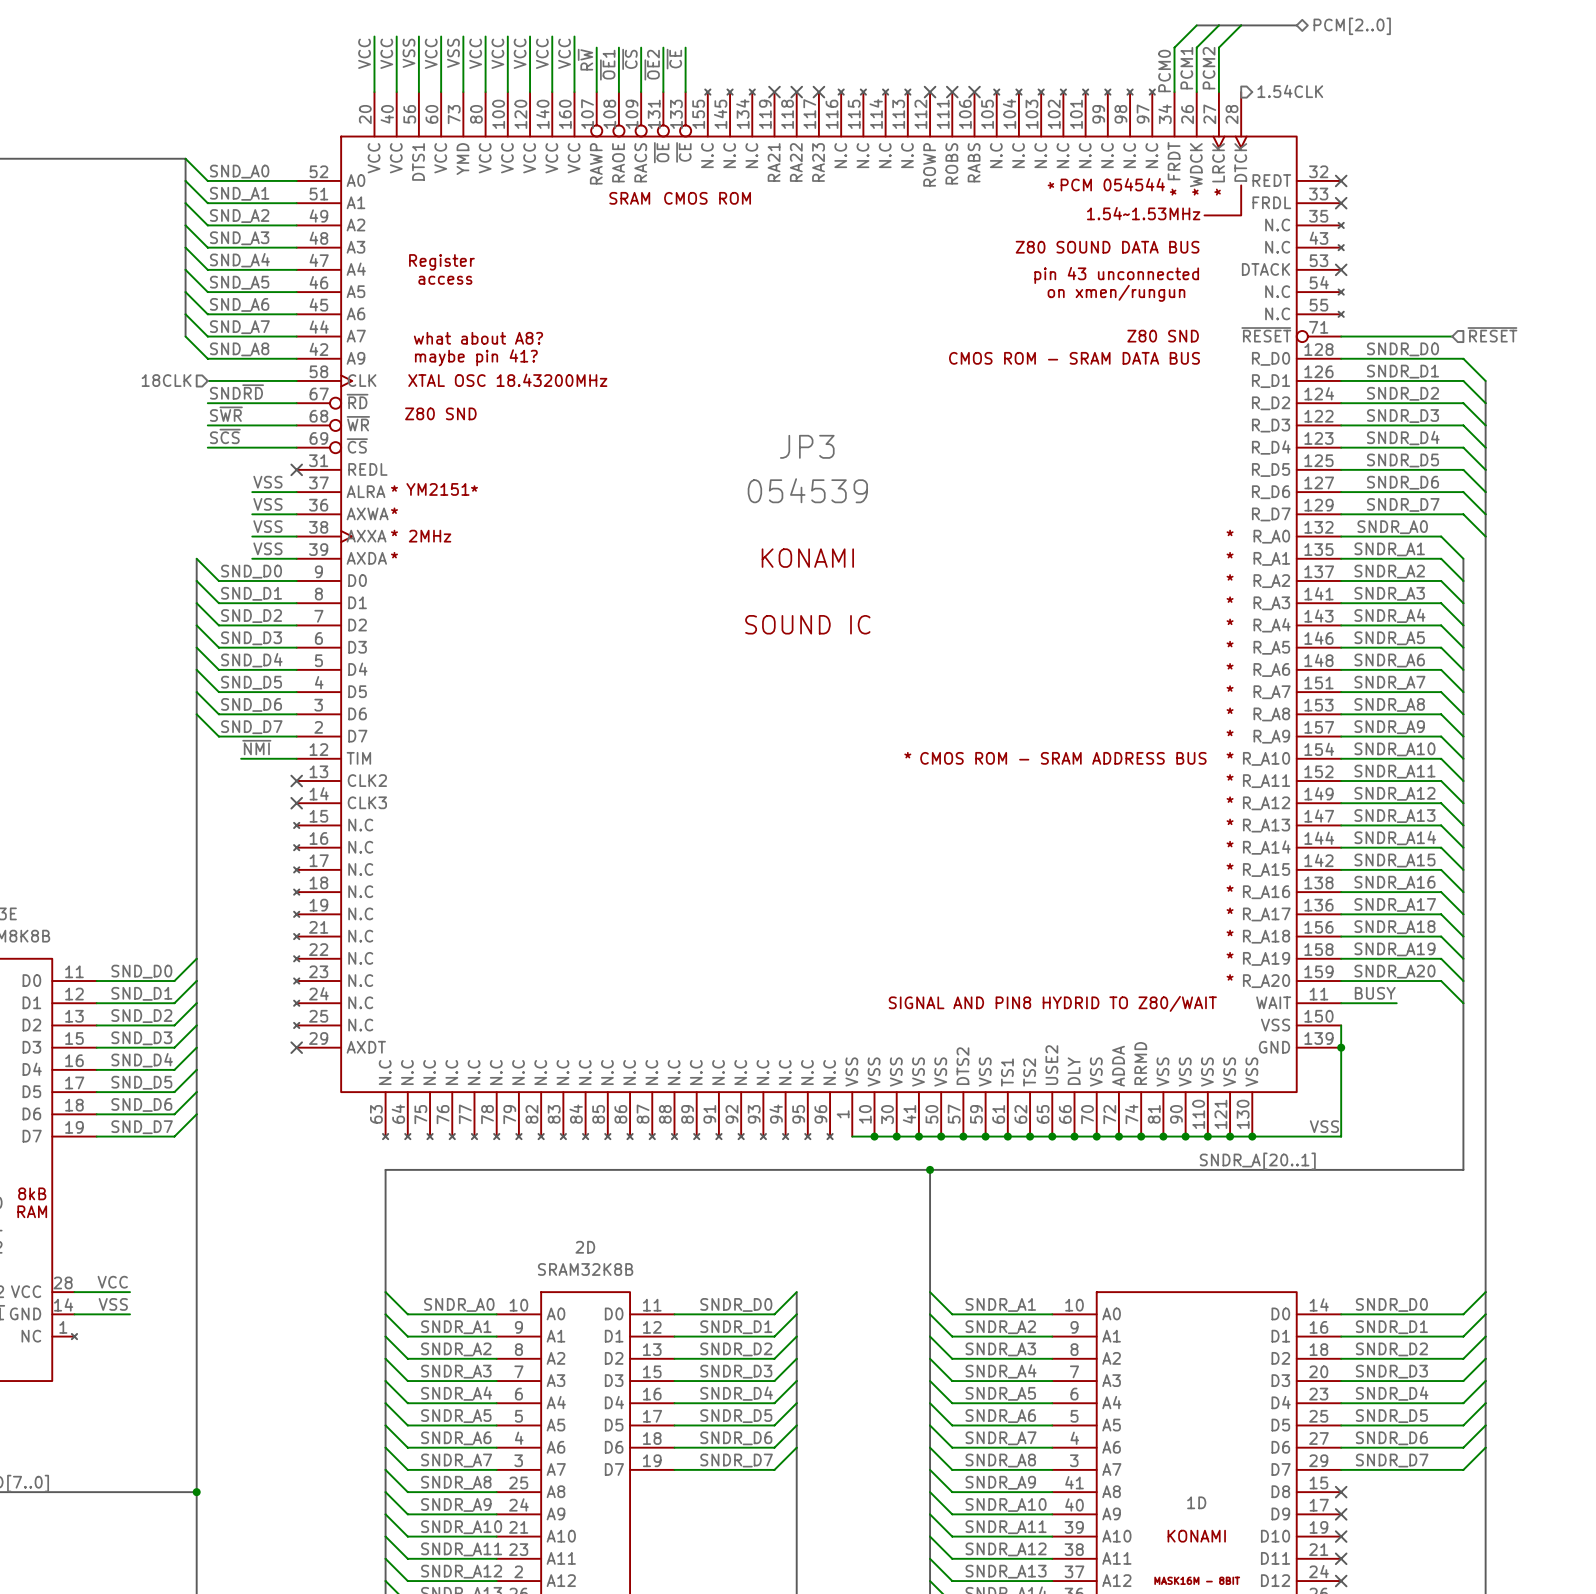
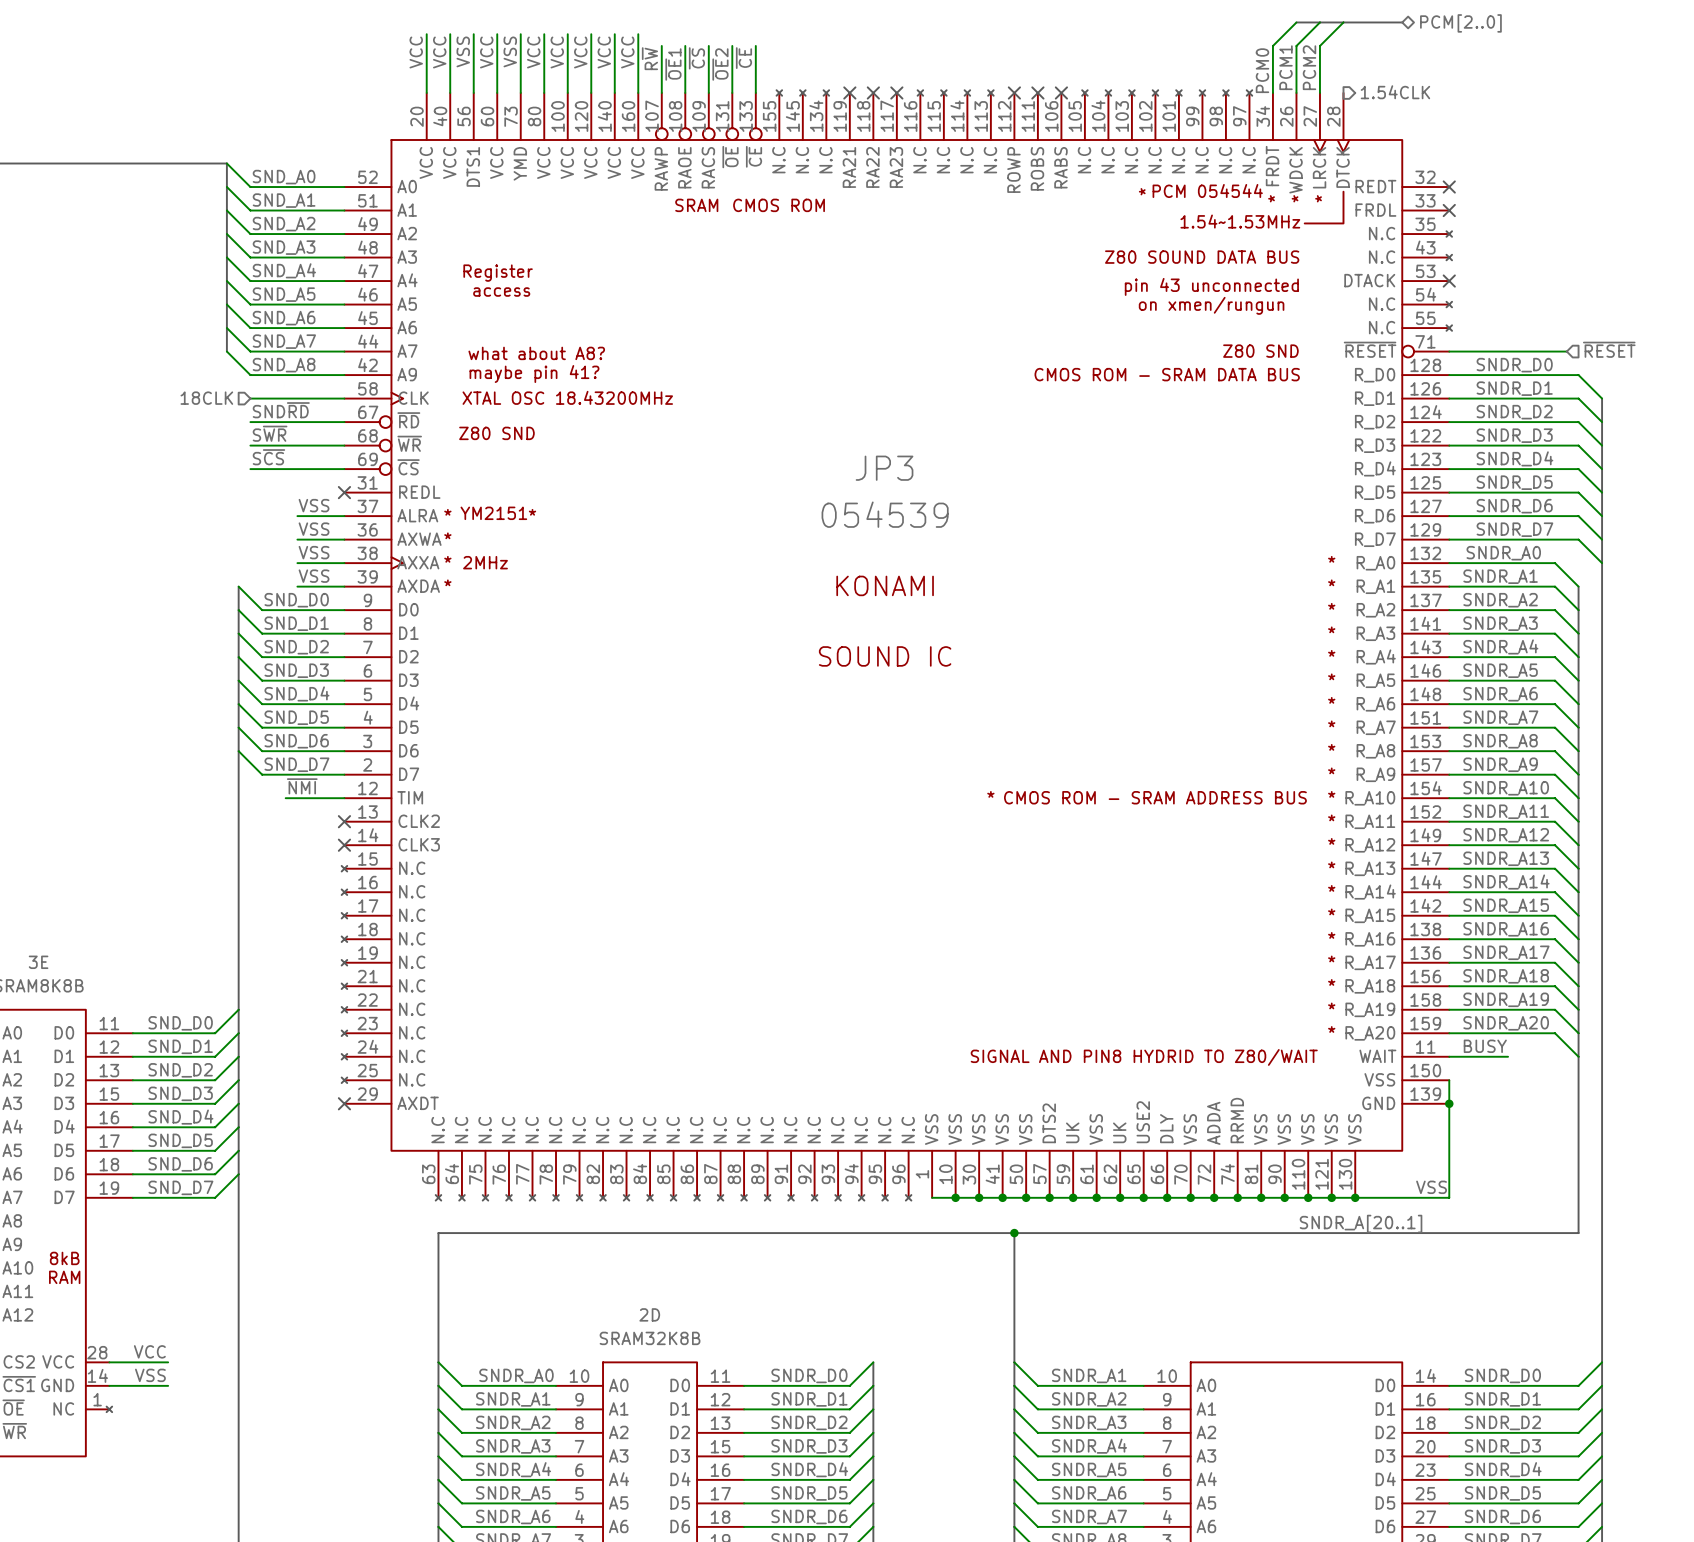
JP3 pin name: VSS (985, 1071) -> UK (1072, 1132)
JP3 pin name: TS1 (1007, 1072) -> VSS (1096, 1129)
JP3 pin name: TS2 (1029, 1072) -> UK (1119, 1132)

